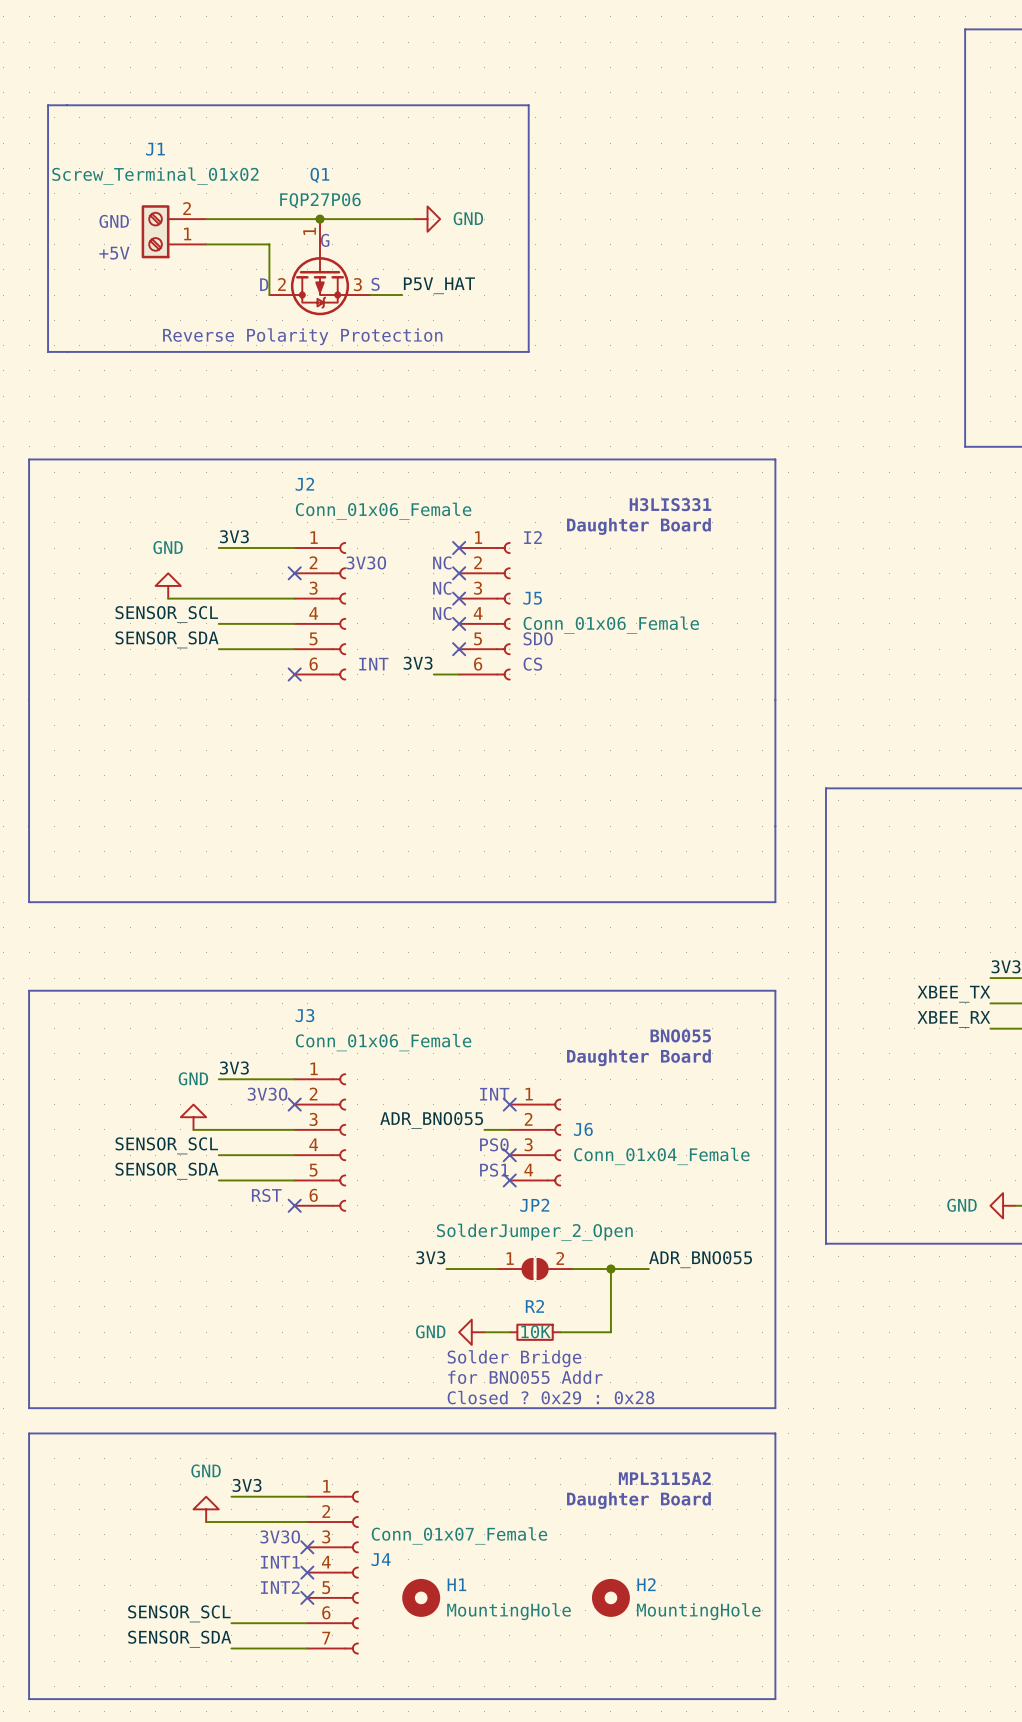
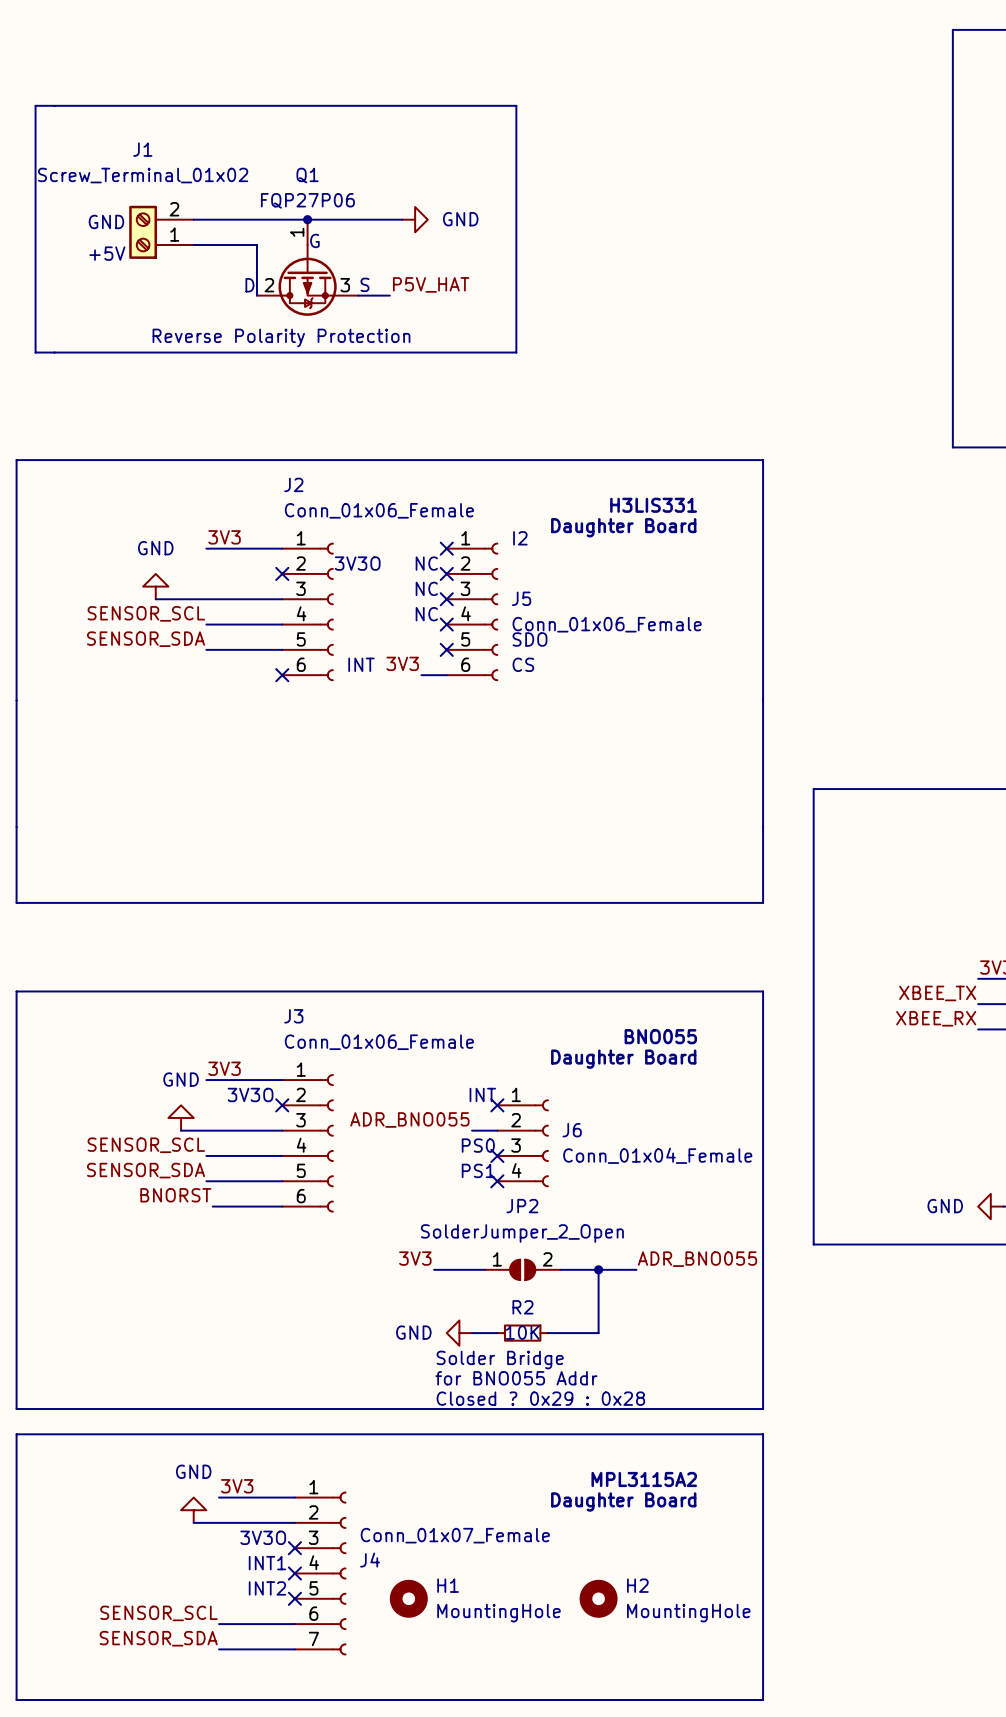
label: none -> BNORST (175, 1195)
text: RST (266, 1195) -> none
wire: none -> (212, 1206) (282, 1206)
no-connect mark: (294, 1205) -> none

